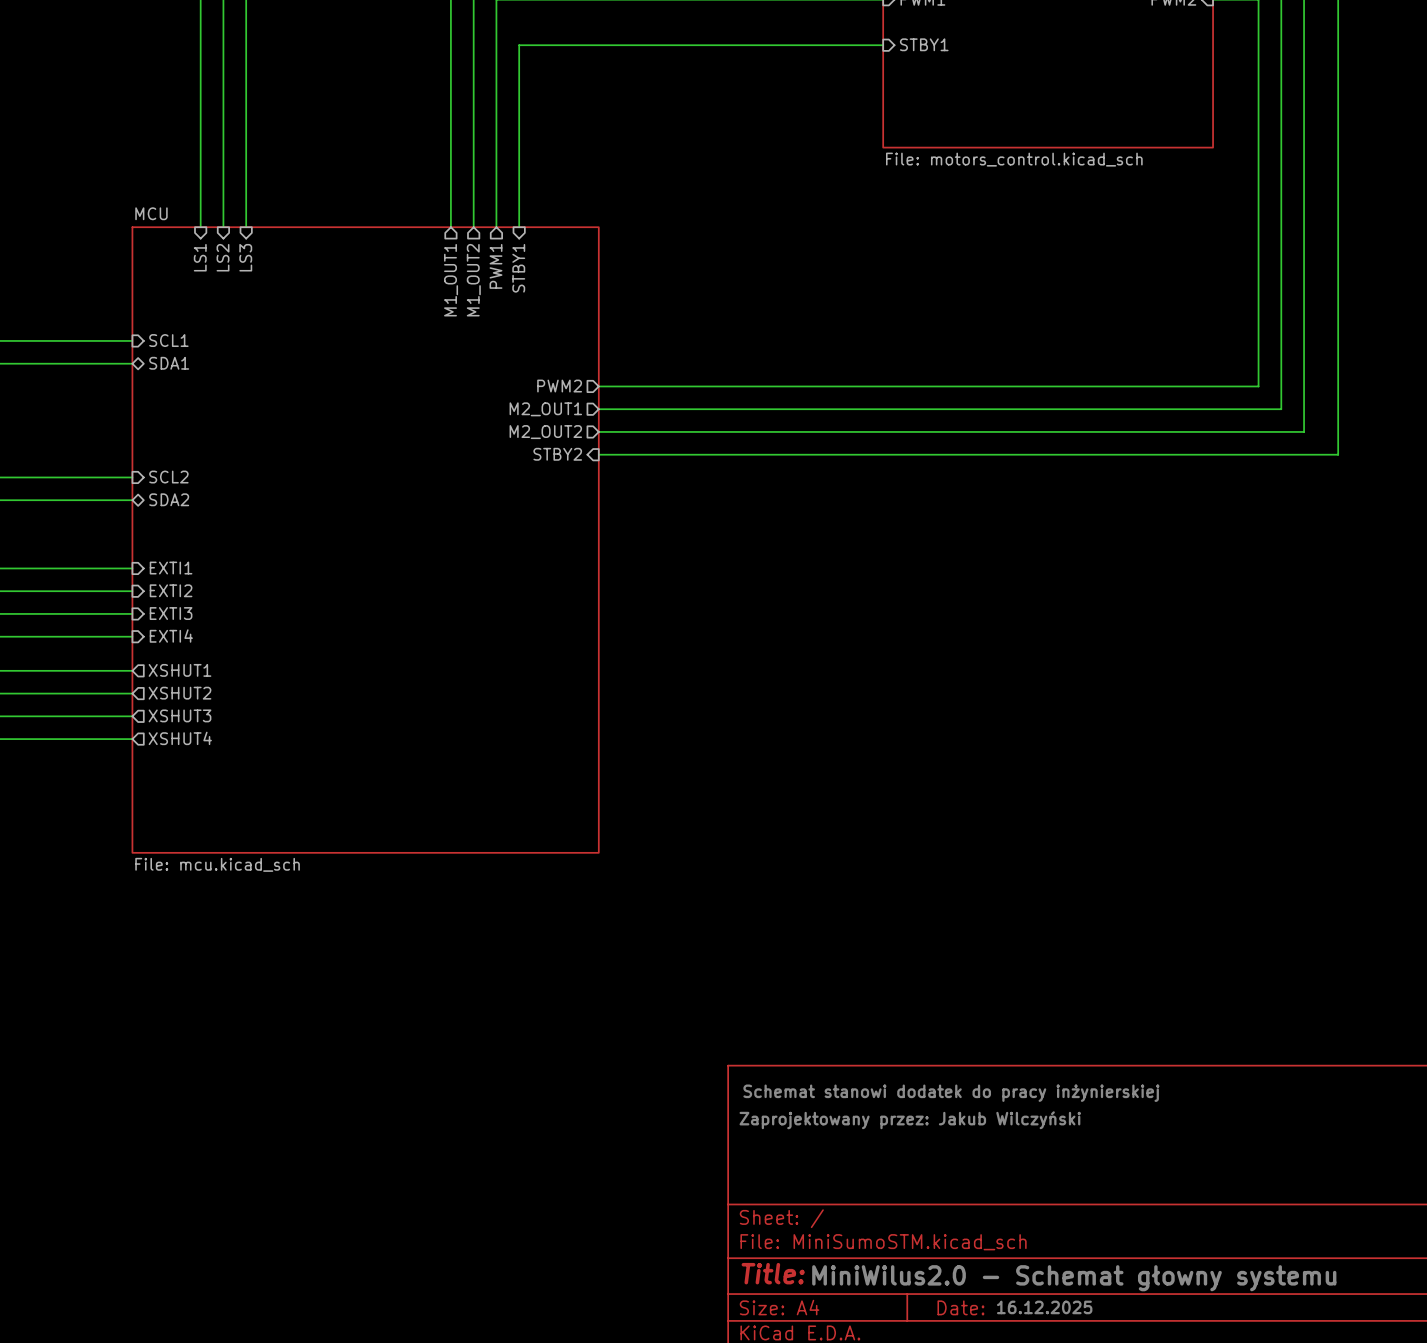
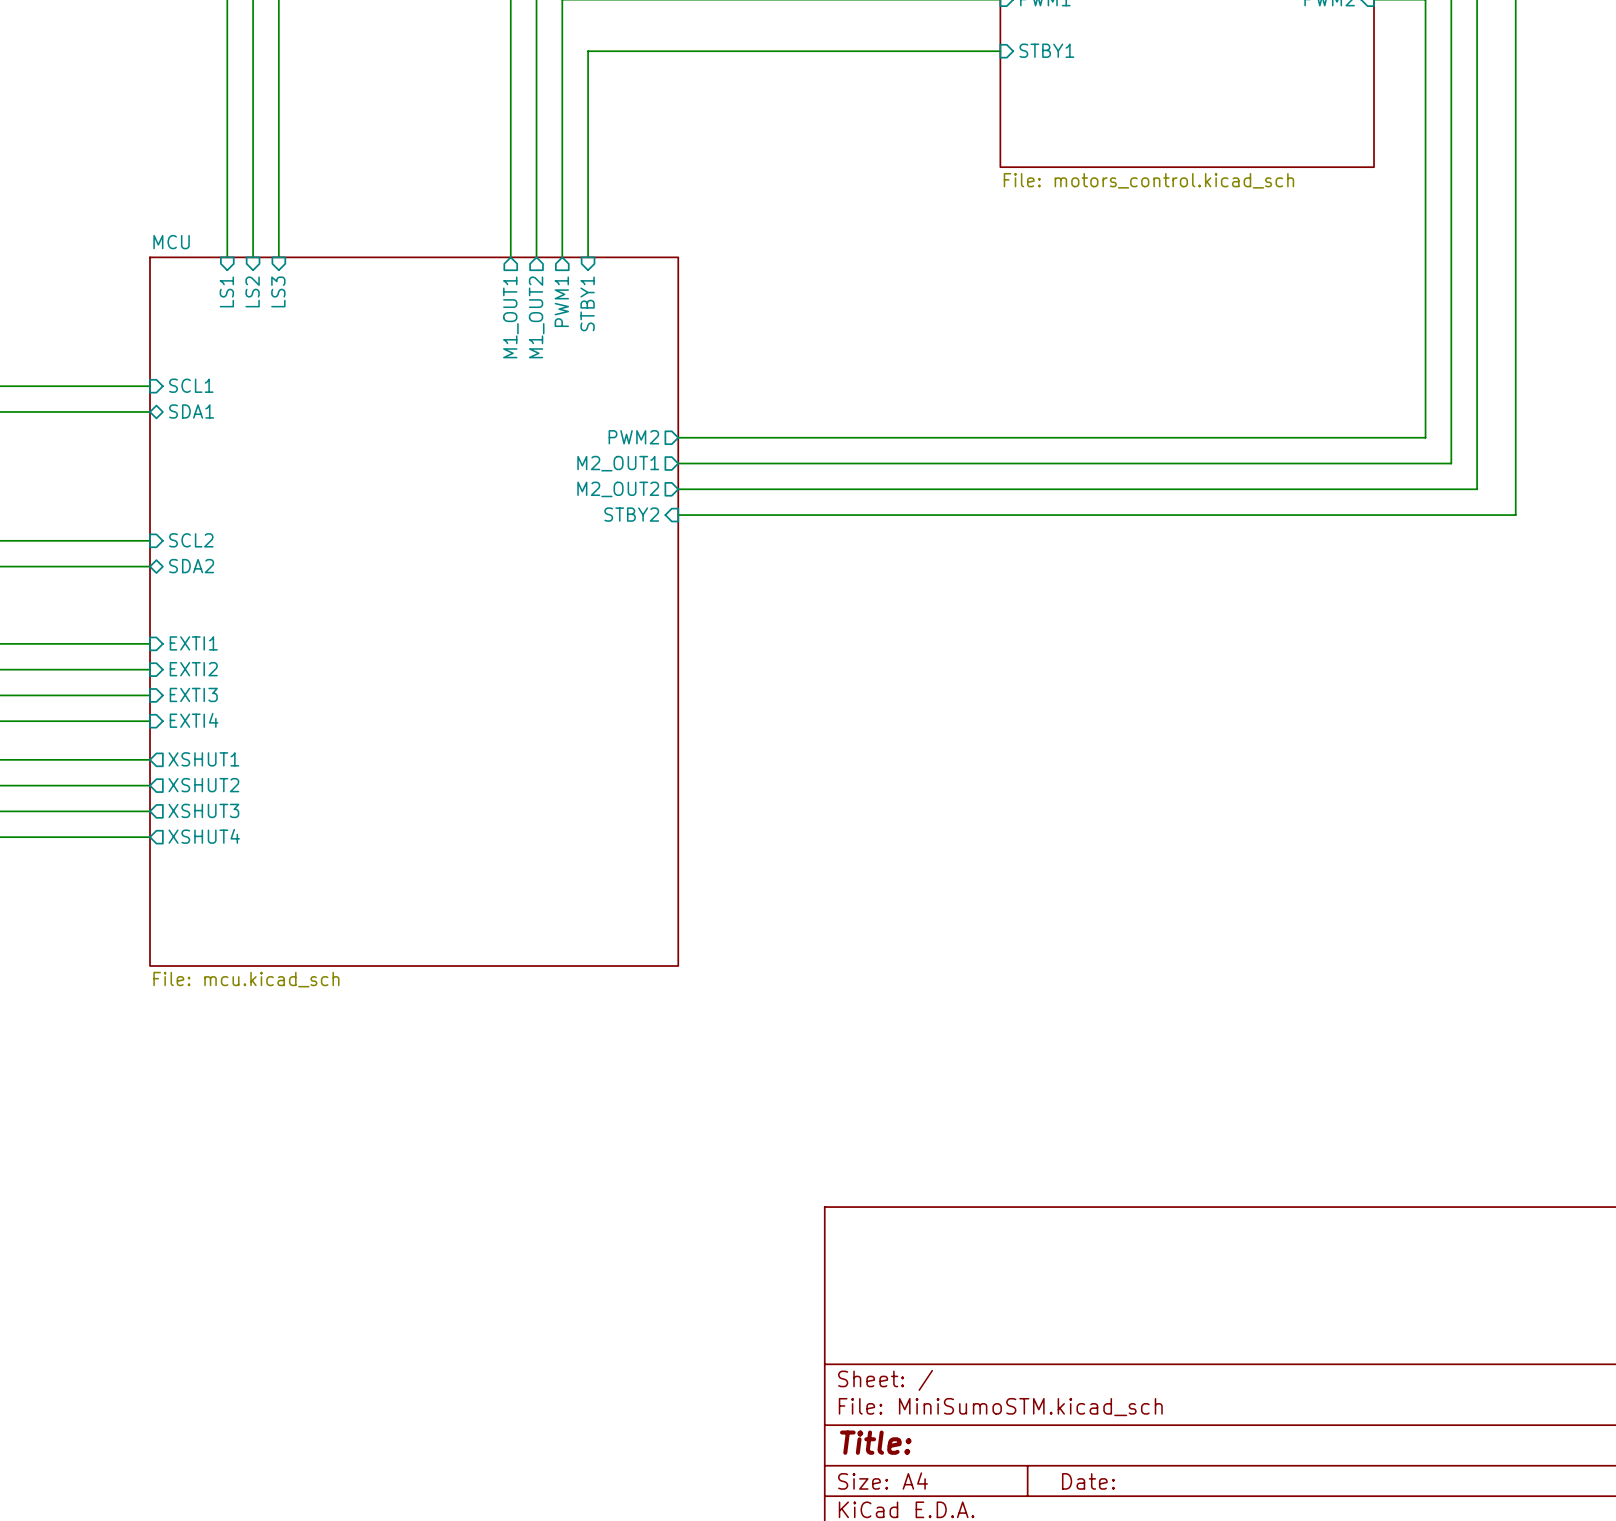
text: Schemat stanowi dodatek do pracy inżynierskiej (951, 1093) -> none
text: Zaprojektowany przez: Jakub Wilczyński (910, 1120) -> none
text: MiniWilus2.0 - Schemat głowny systemu (1074, 1278) -> none
text: 16.12.2025 (1044, 1307) -> none

